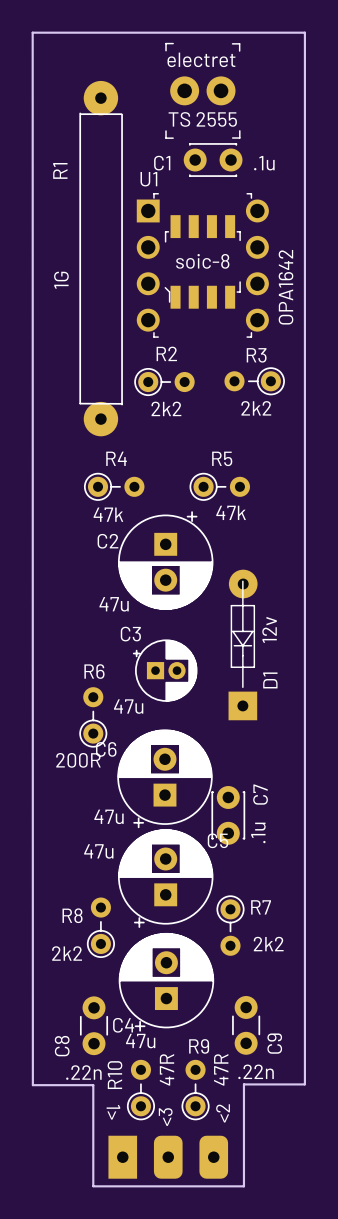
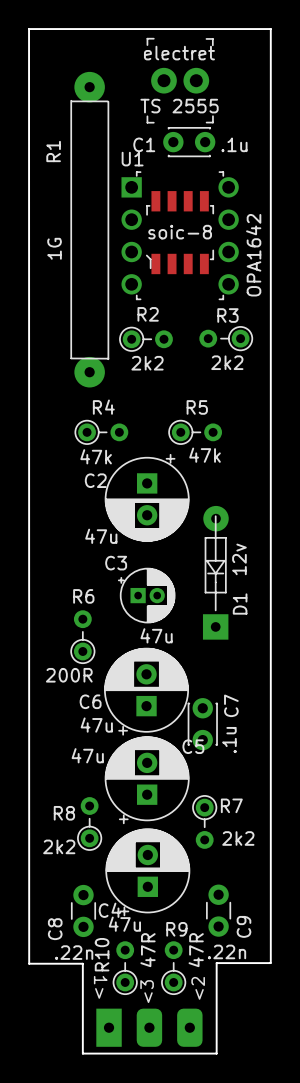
C3 value position: 47u (128, 706) -> 47u (156, 635)
C6 name position: C6 (106, 749) -> C6 (90, 701)

